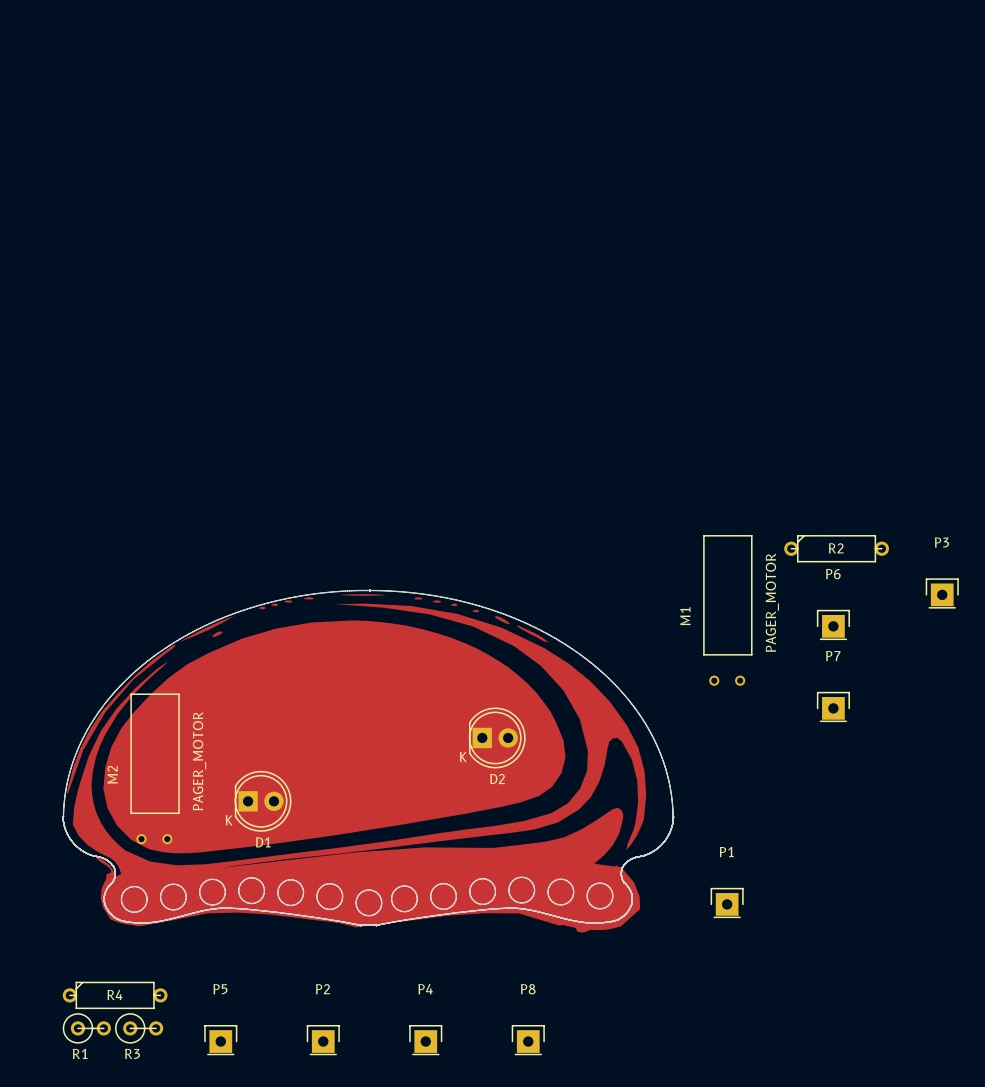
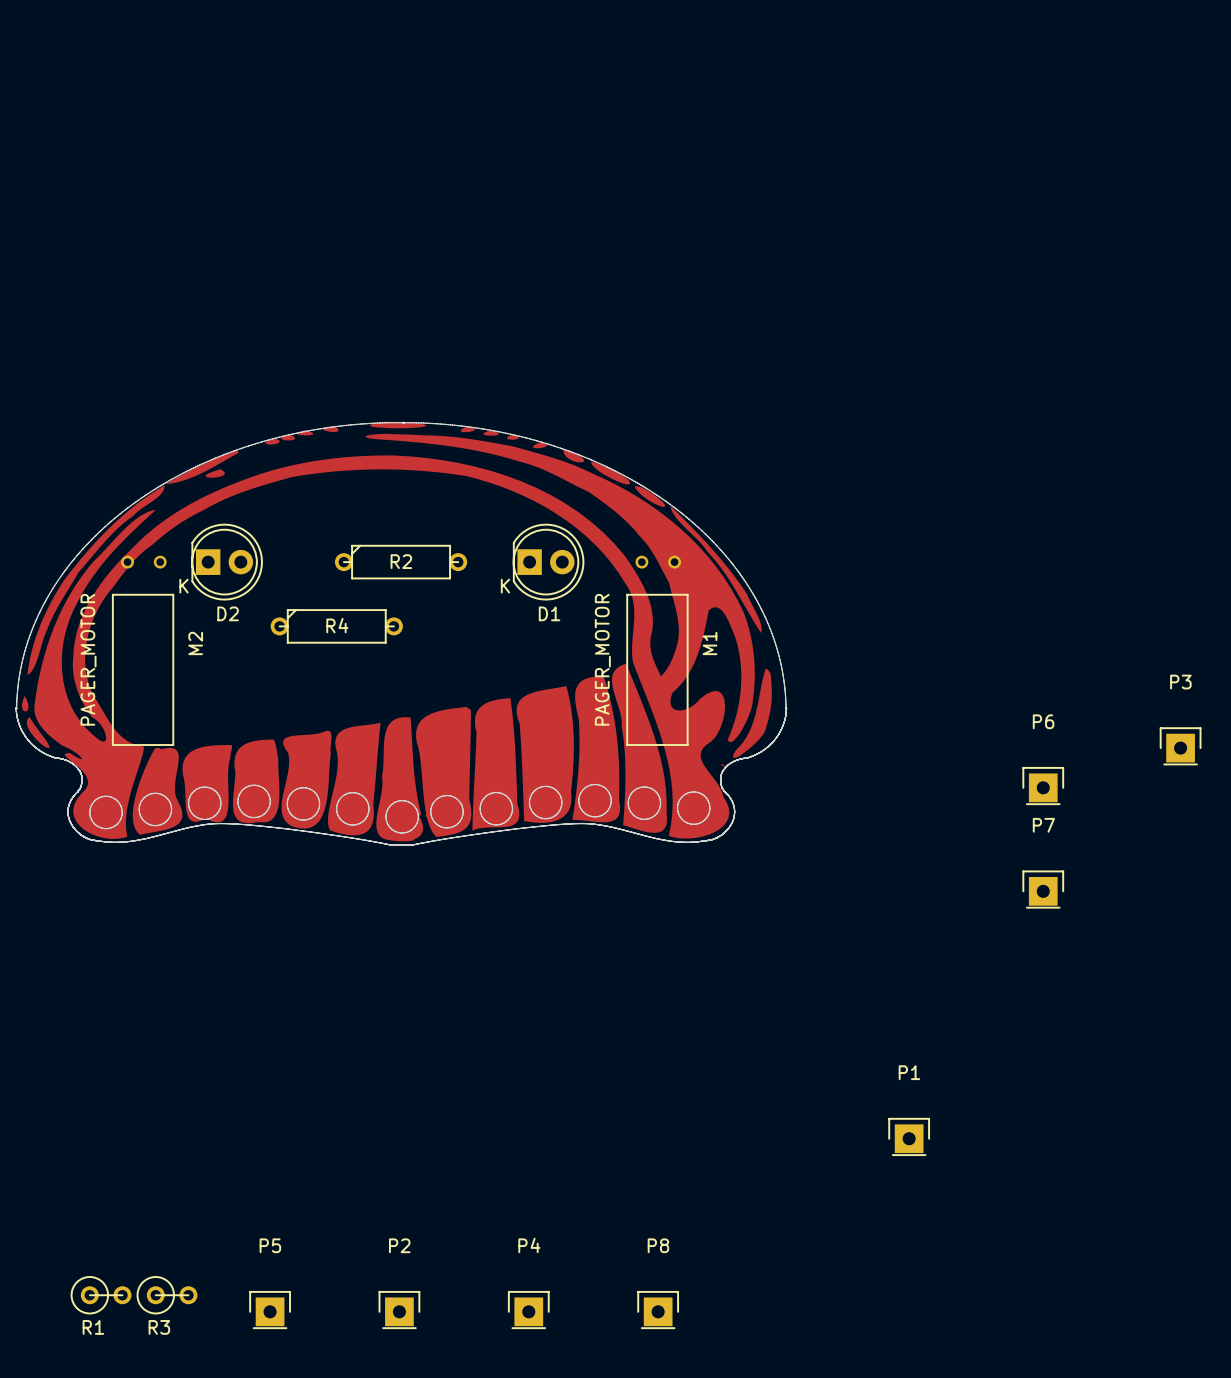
drawing: none -> [15, 421, 787, 846]
R2 position: (836, 548) -> (401, 562)
drawing: [62, 590, 674, 933] -> none
M1 rotation: 0° (727, 610) -> 180° (657, 650)
M1 position: (727, 610) -> (657, 650)
D2 position: (497, 737) -> (227, 562)
M2 rotation: 0° (155, 768) -> 180° (143, 650)
M2 position: (155, 768) -> (143, 650)
D1 position: (263, 801) -> (548, 562)
R4 position: (115, 995) -> (336, 626)

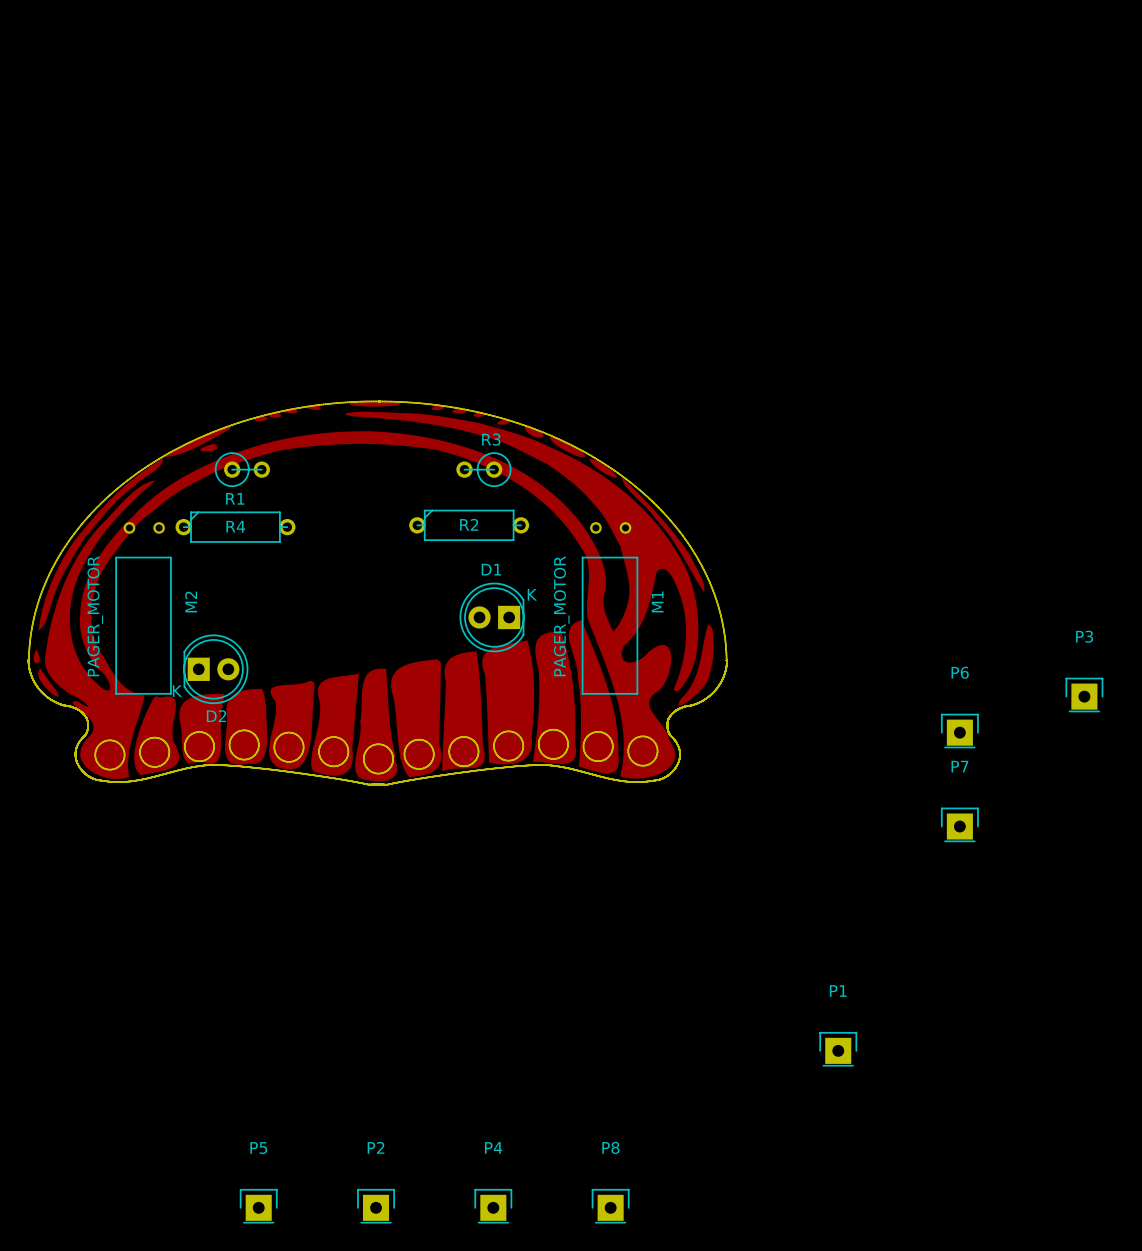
D2 position: (227, 562) -> (215, 669)
R2 position: (401, 562) -> (469, 525)
D1 rotation: 0° (548, 562) -> 180° (492, 617)
D1 position: (548, 562) -> (492, 617)
R4 position: (336, 626) -> (235, 527)
R1 position: (101, 1295) -> (242, 469)
R3 rotation: 0° (166, 1295) -> 180° (483, 469)
R3 position: (166, 1295) -> (483, 469)

